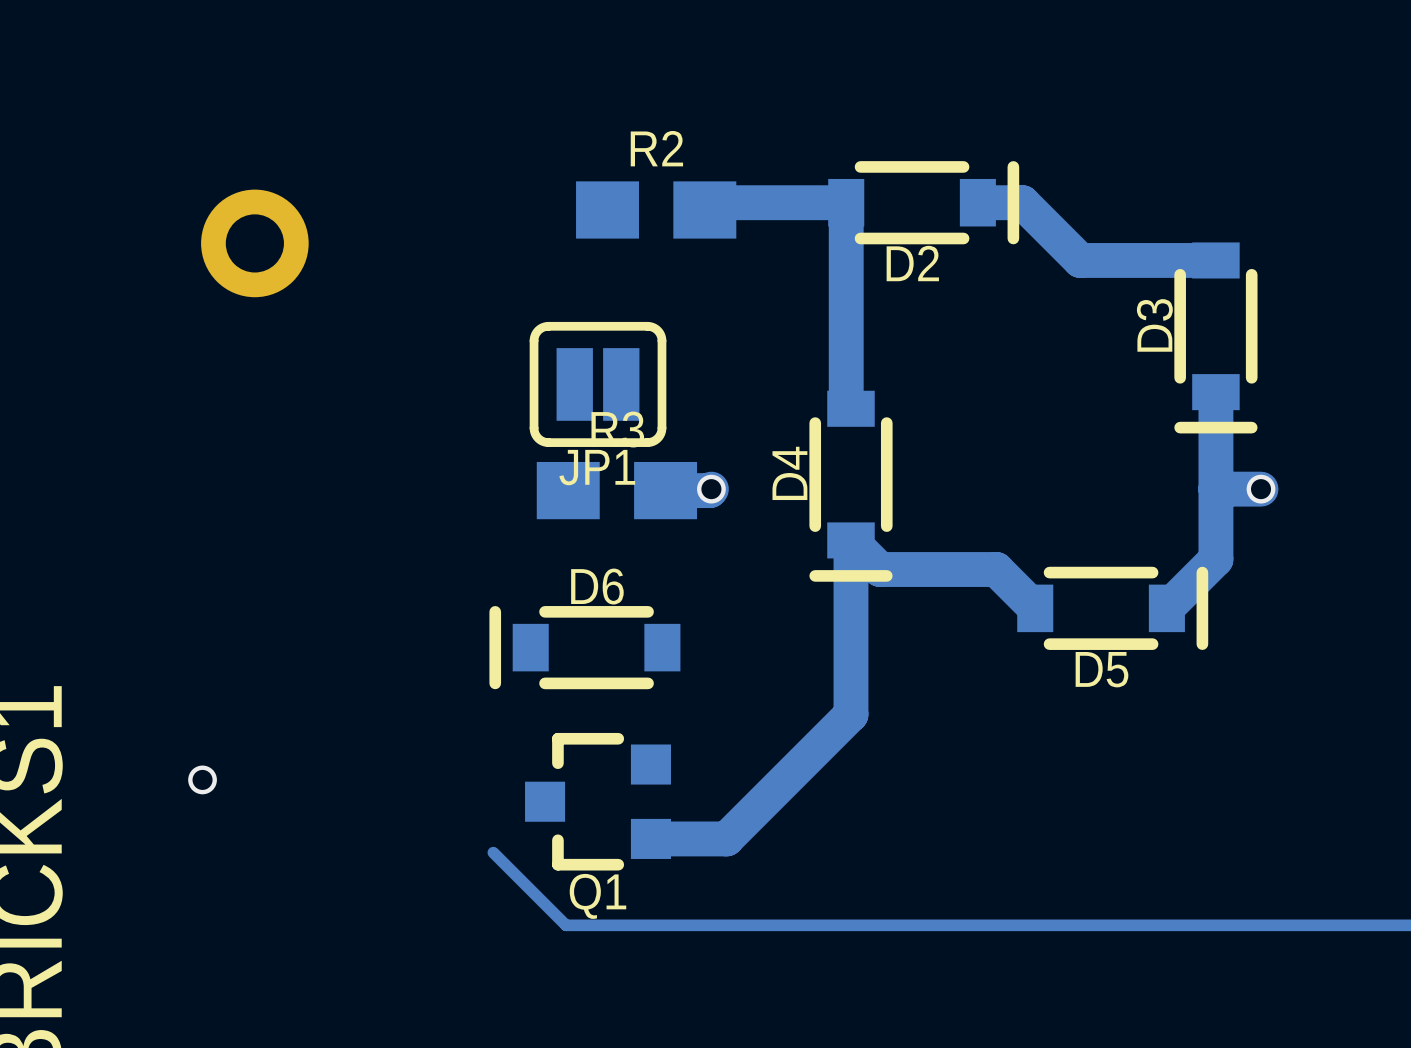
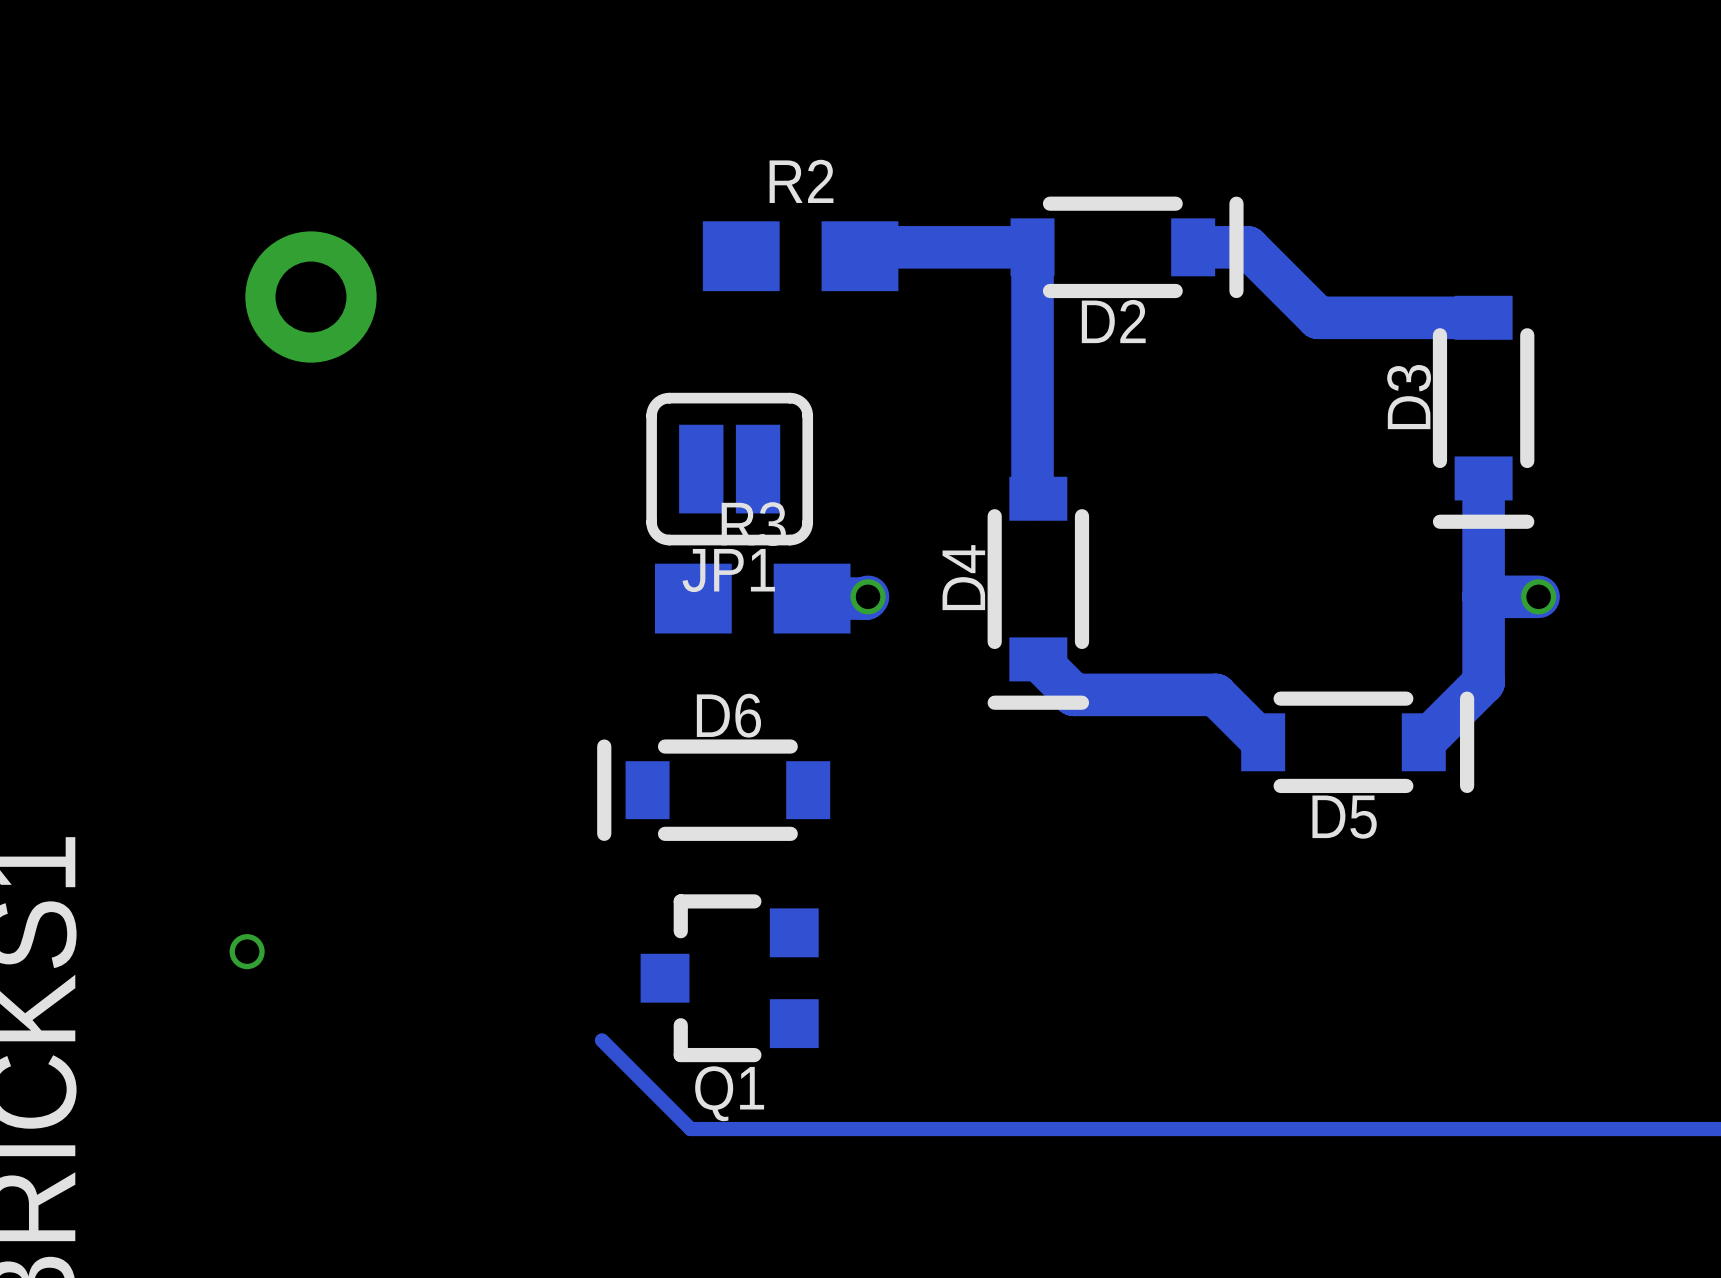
track: (850, 540) (850, 714) (726, 838) (650, 838) -> none

